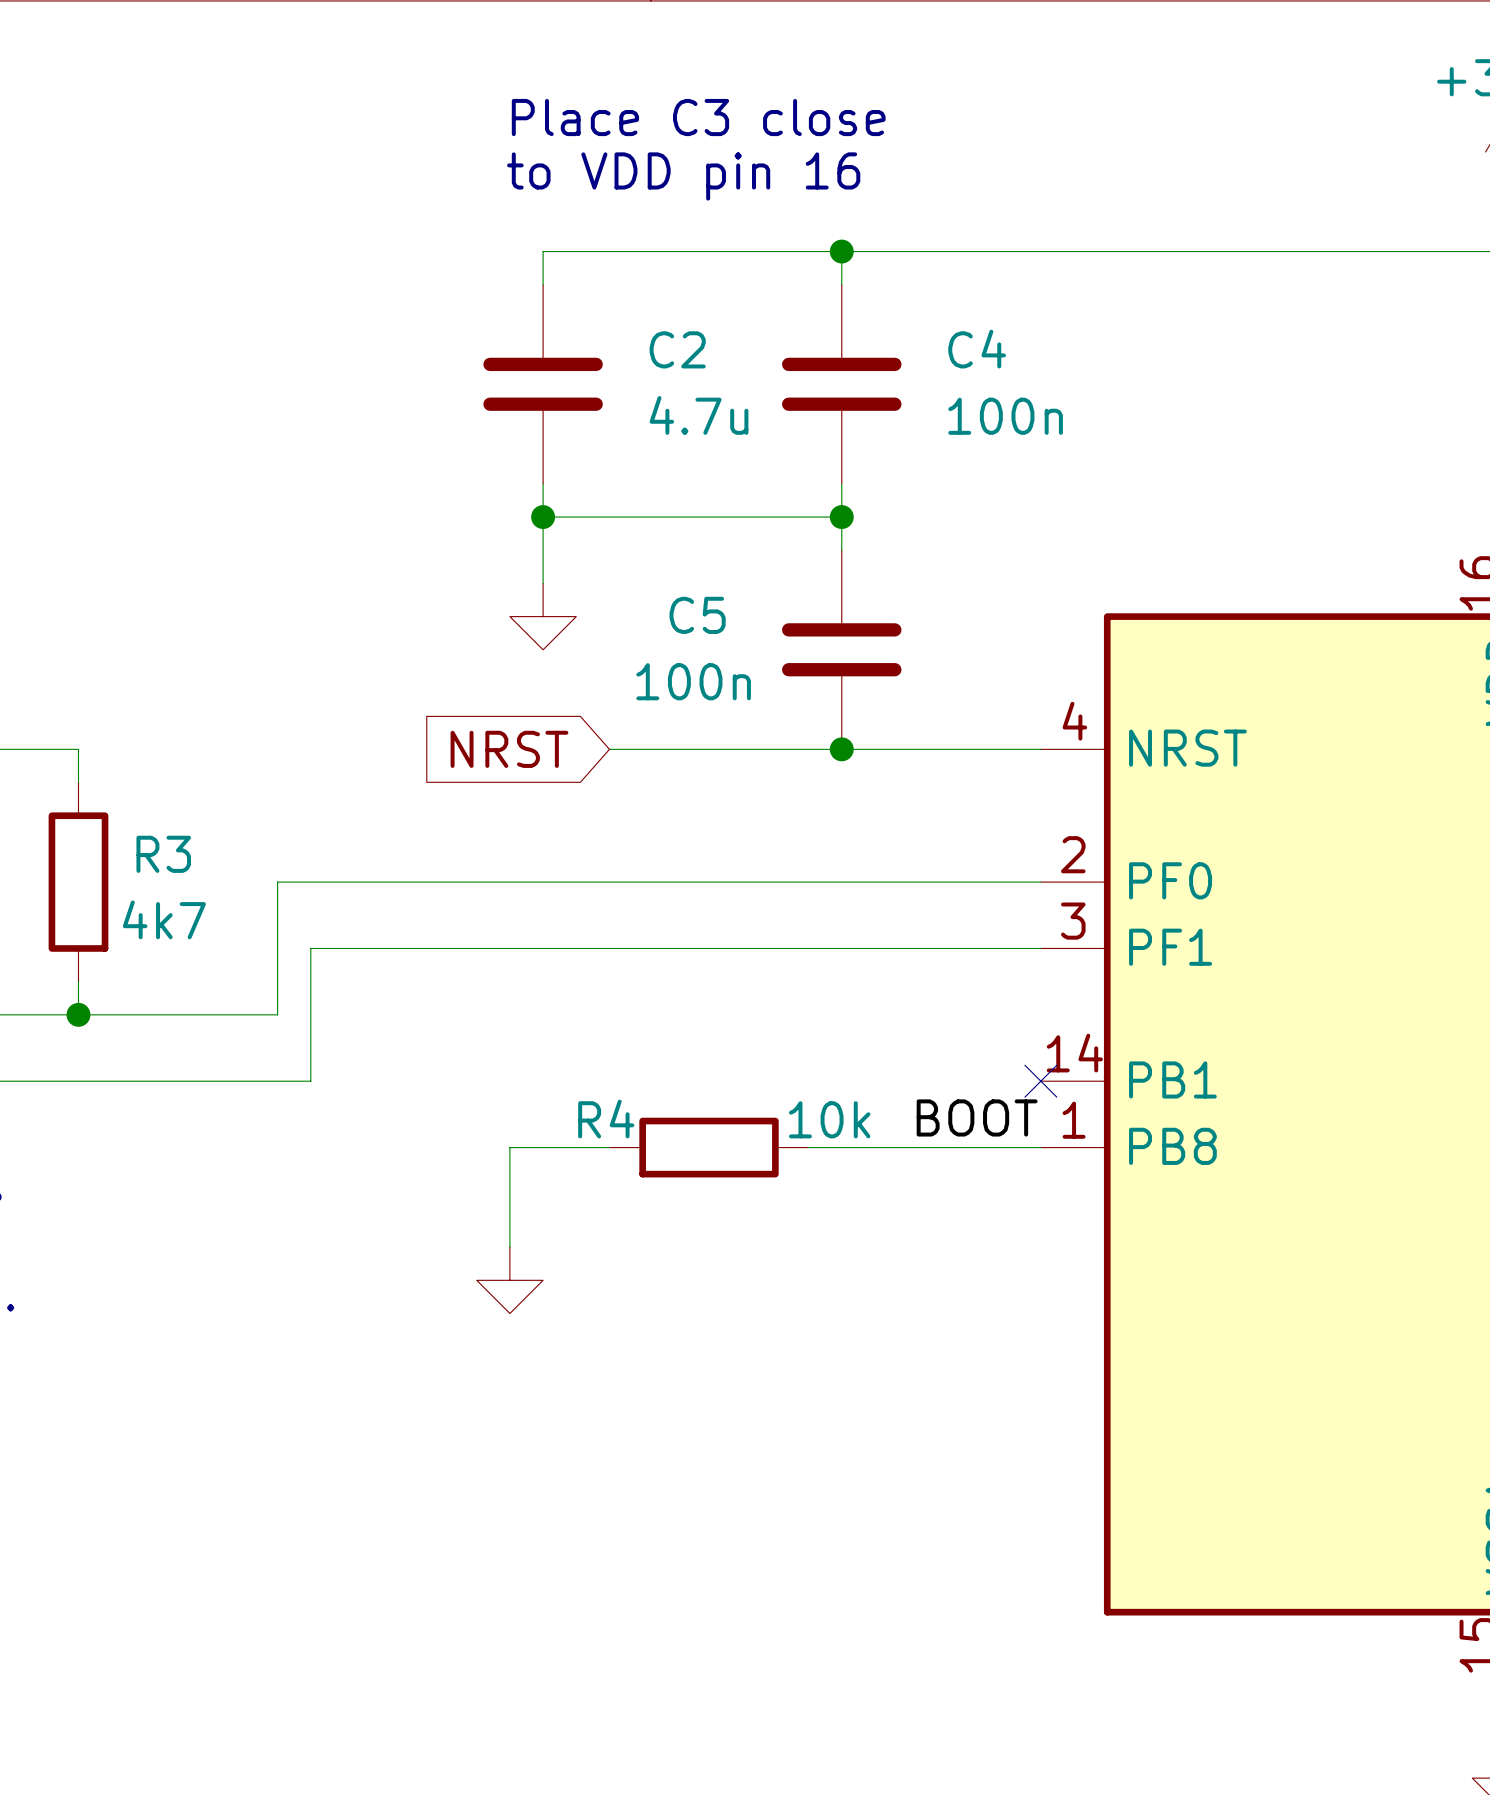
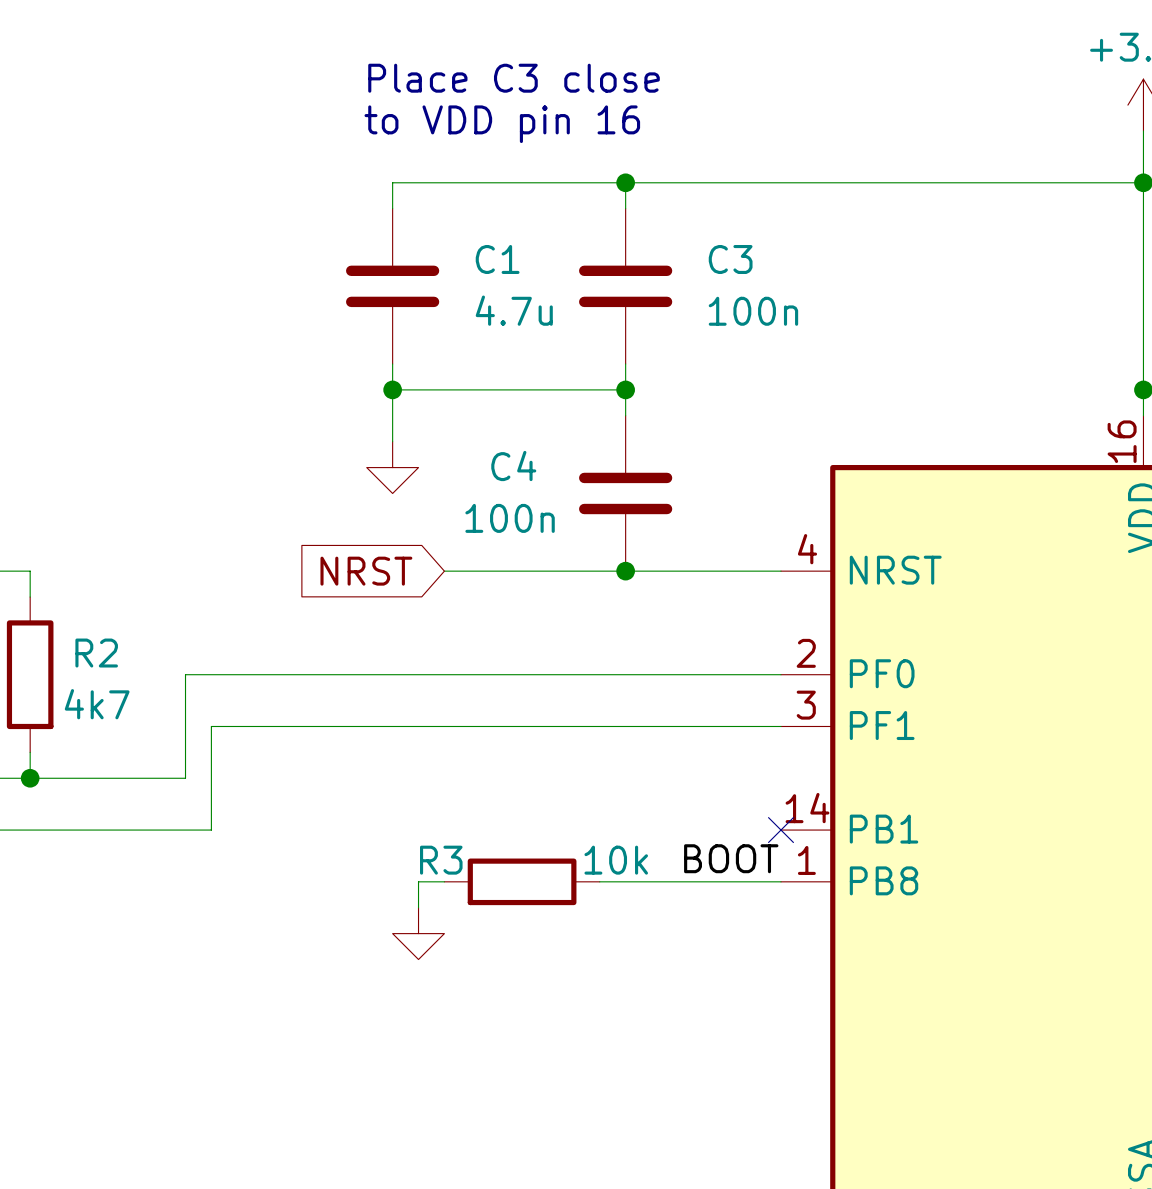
C2 name: C2 (677, 349) -> C1 (497, 259)
C4 name: C4 (977, 349) -> C3 (730, 259)
C5 name: C5 (697, 615) -> C4 (513, 466)
R3 name: R3 (163, 854) -> R2 (96, 653)
R4 name: R4 (606, 1119) -> R3 (441, 860)
wire: (576, 1147) (509, 1147) (509, 1247) -> (418, 881) (418, 907)
power symbol position: (509, 1280) -> (418, 933)

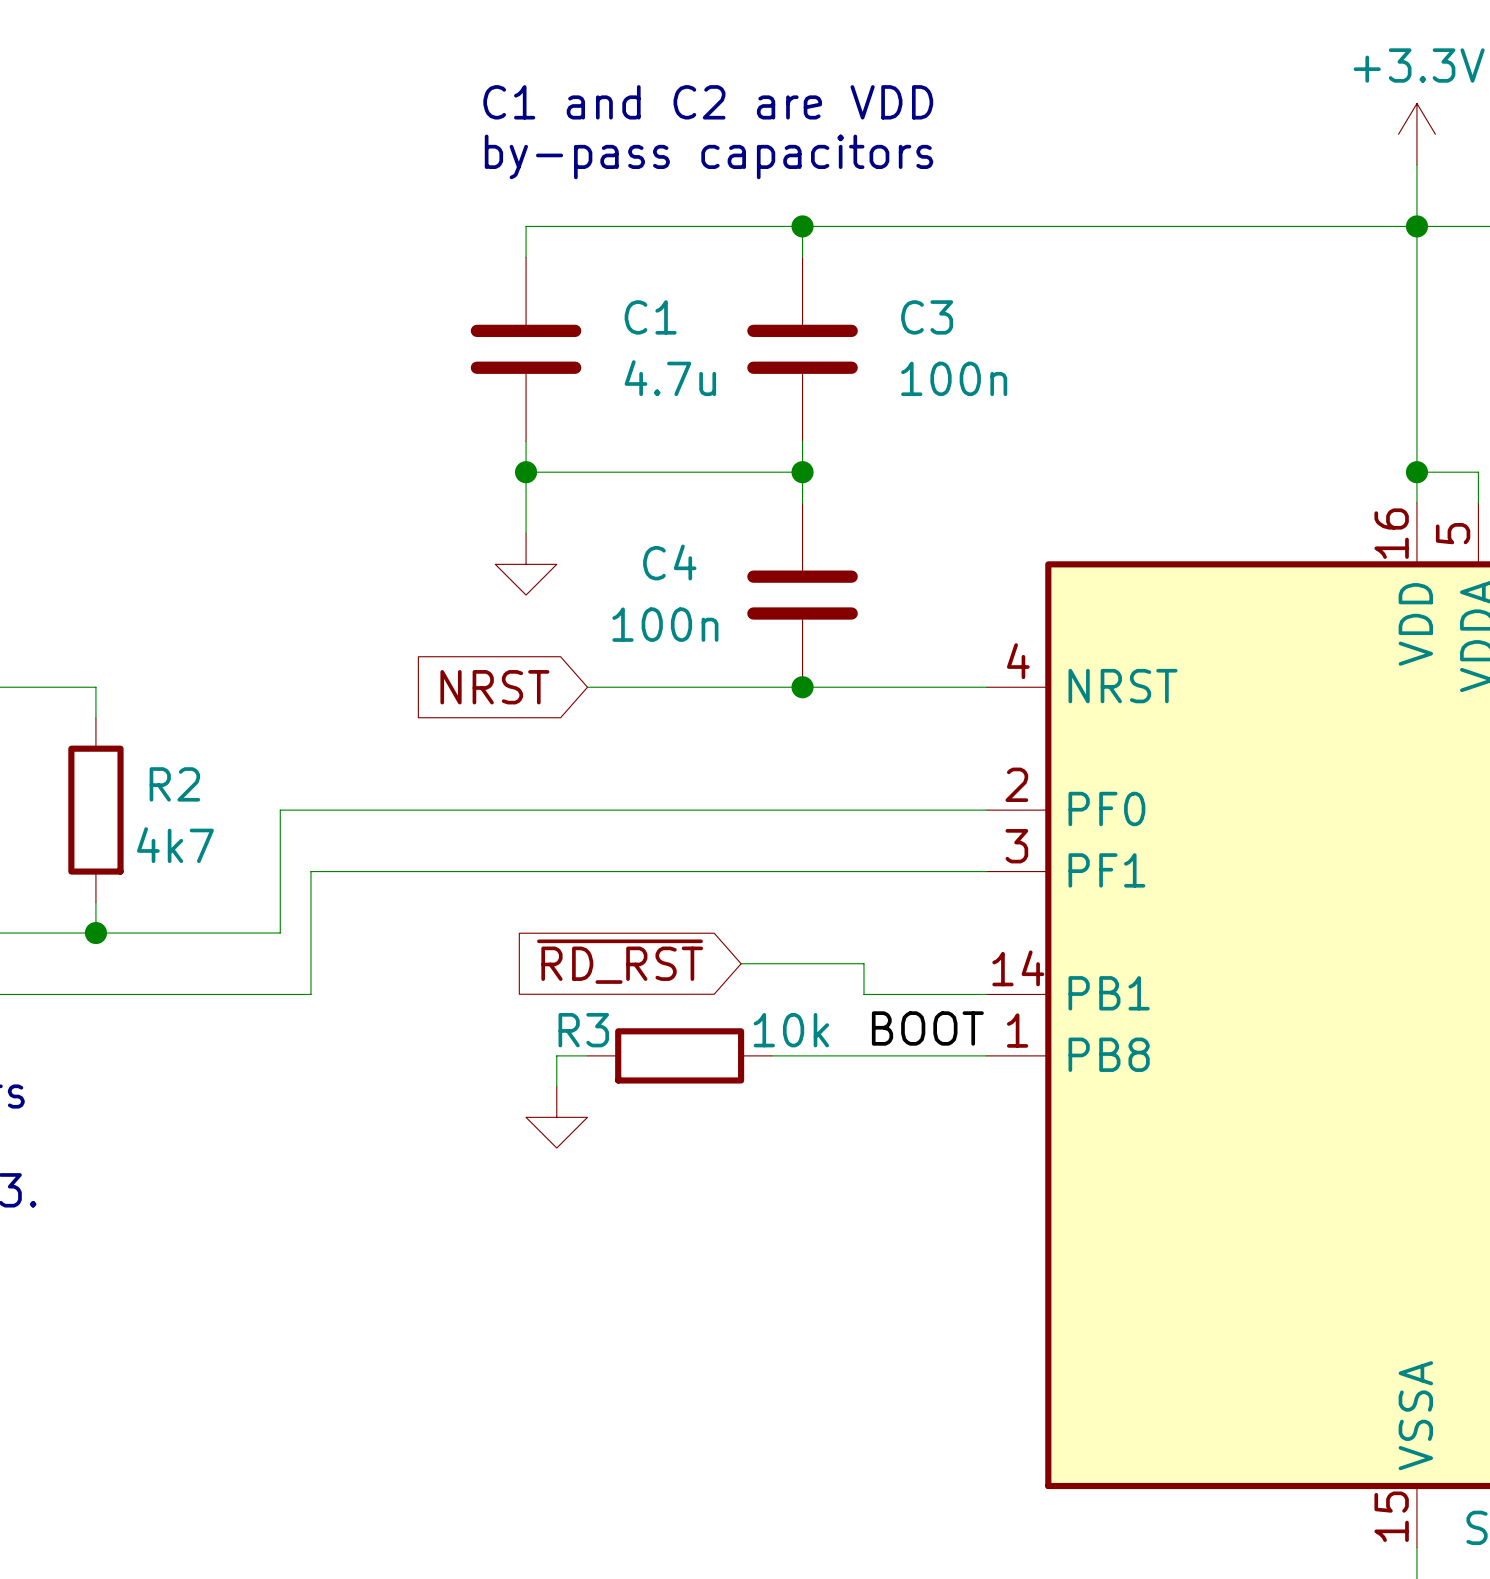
text: Place C3 close (514, 78) -> C1 and C2 are VDD (708, 102)
text: to VDD pin 16 (502, 124) -> by-pass capacitors (709, 156)
global label: none -> ~{RD_RST} (620, 961)
wire: none -> (741, 963) (863, 963) (863, 994) (986, 994)
no-connect mark: (780, 830) -> none

